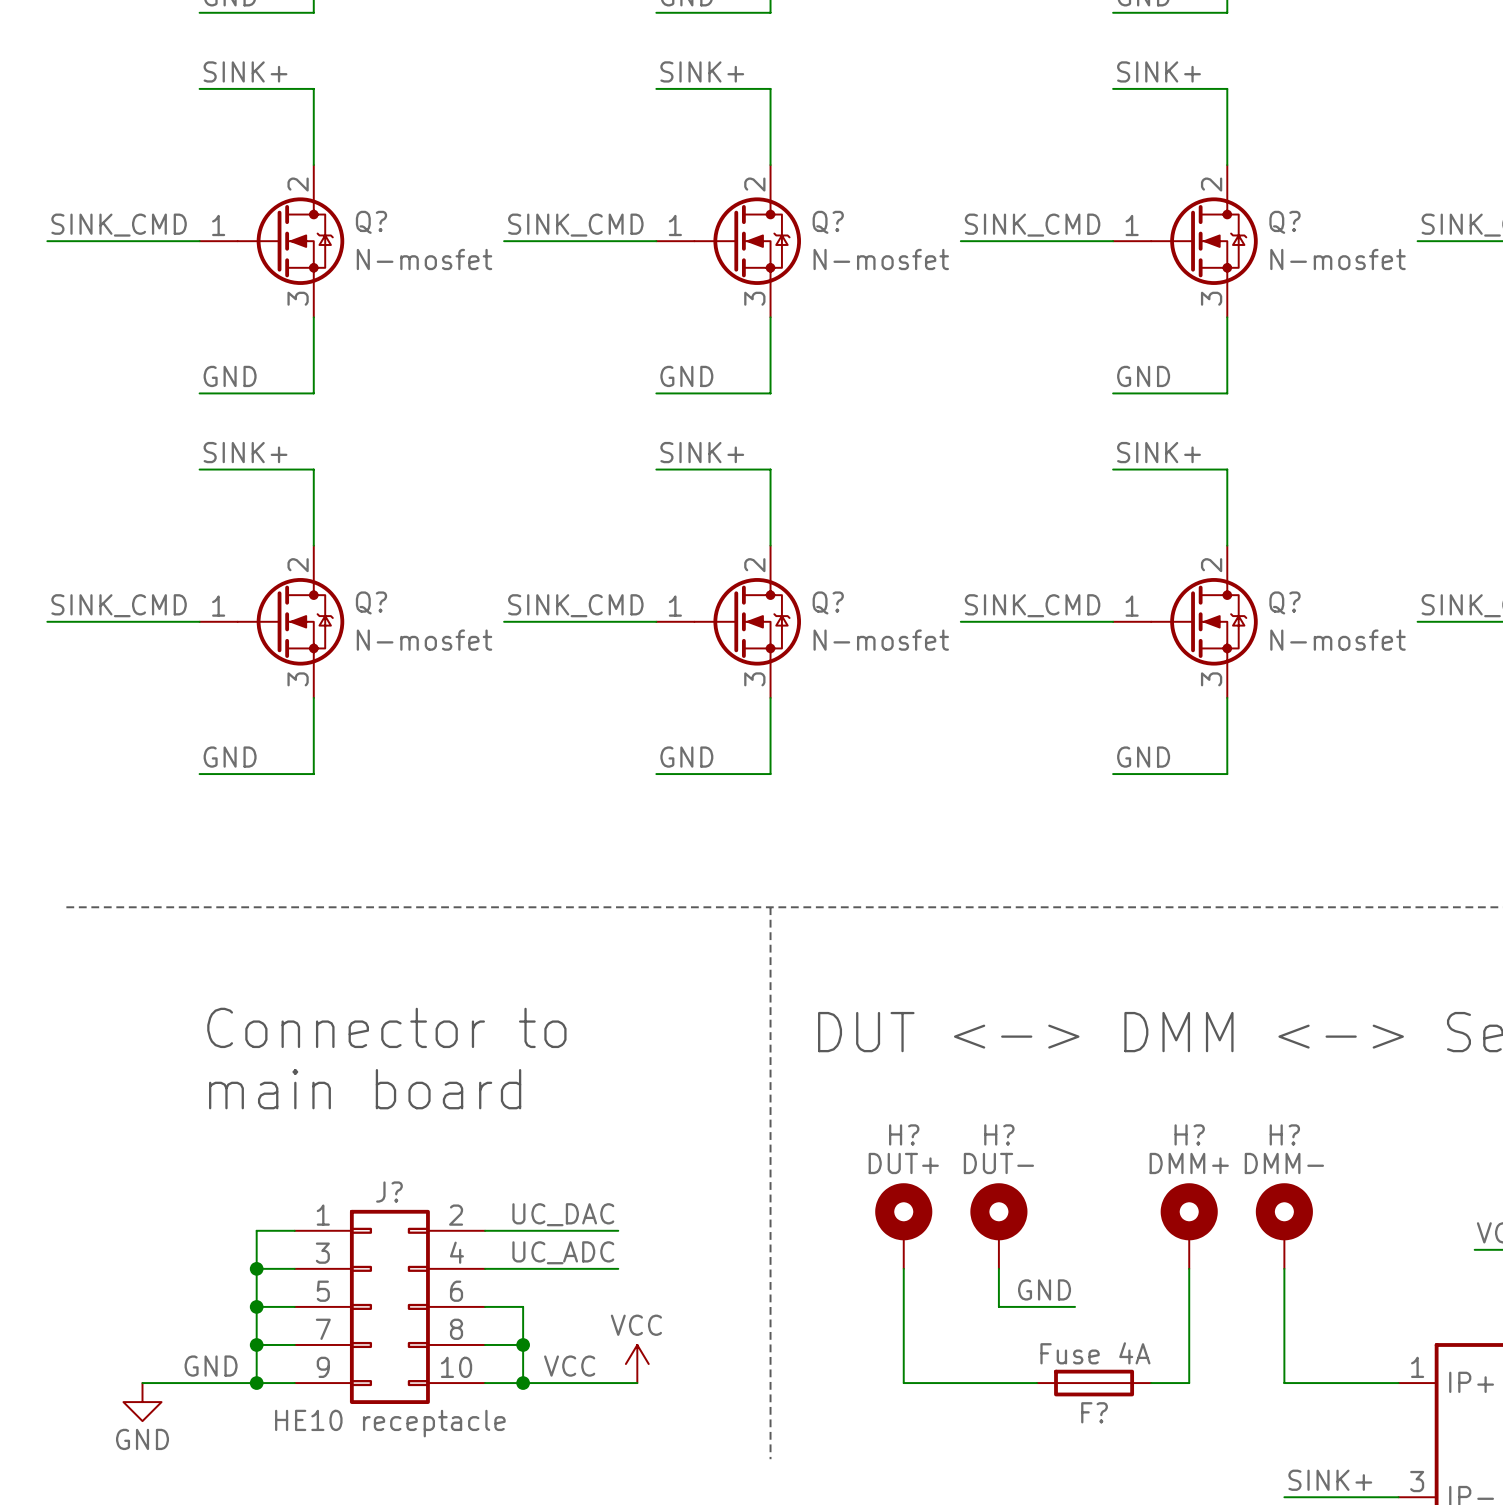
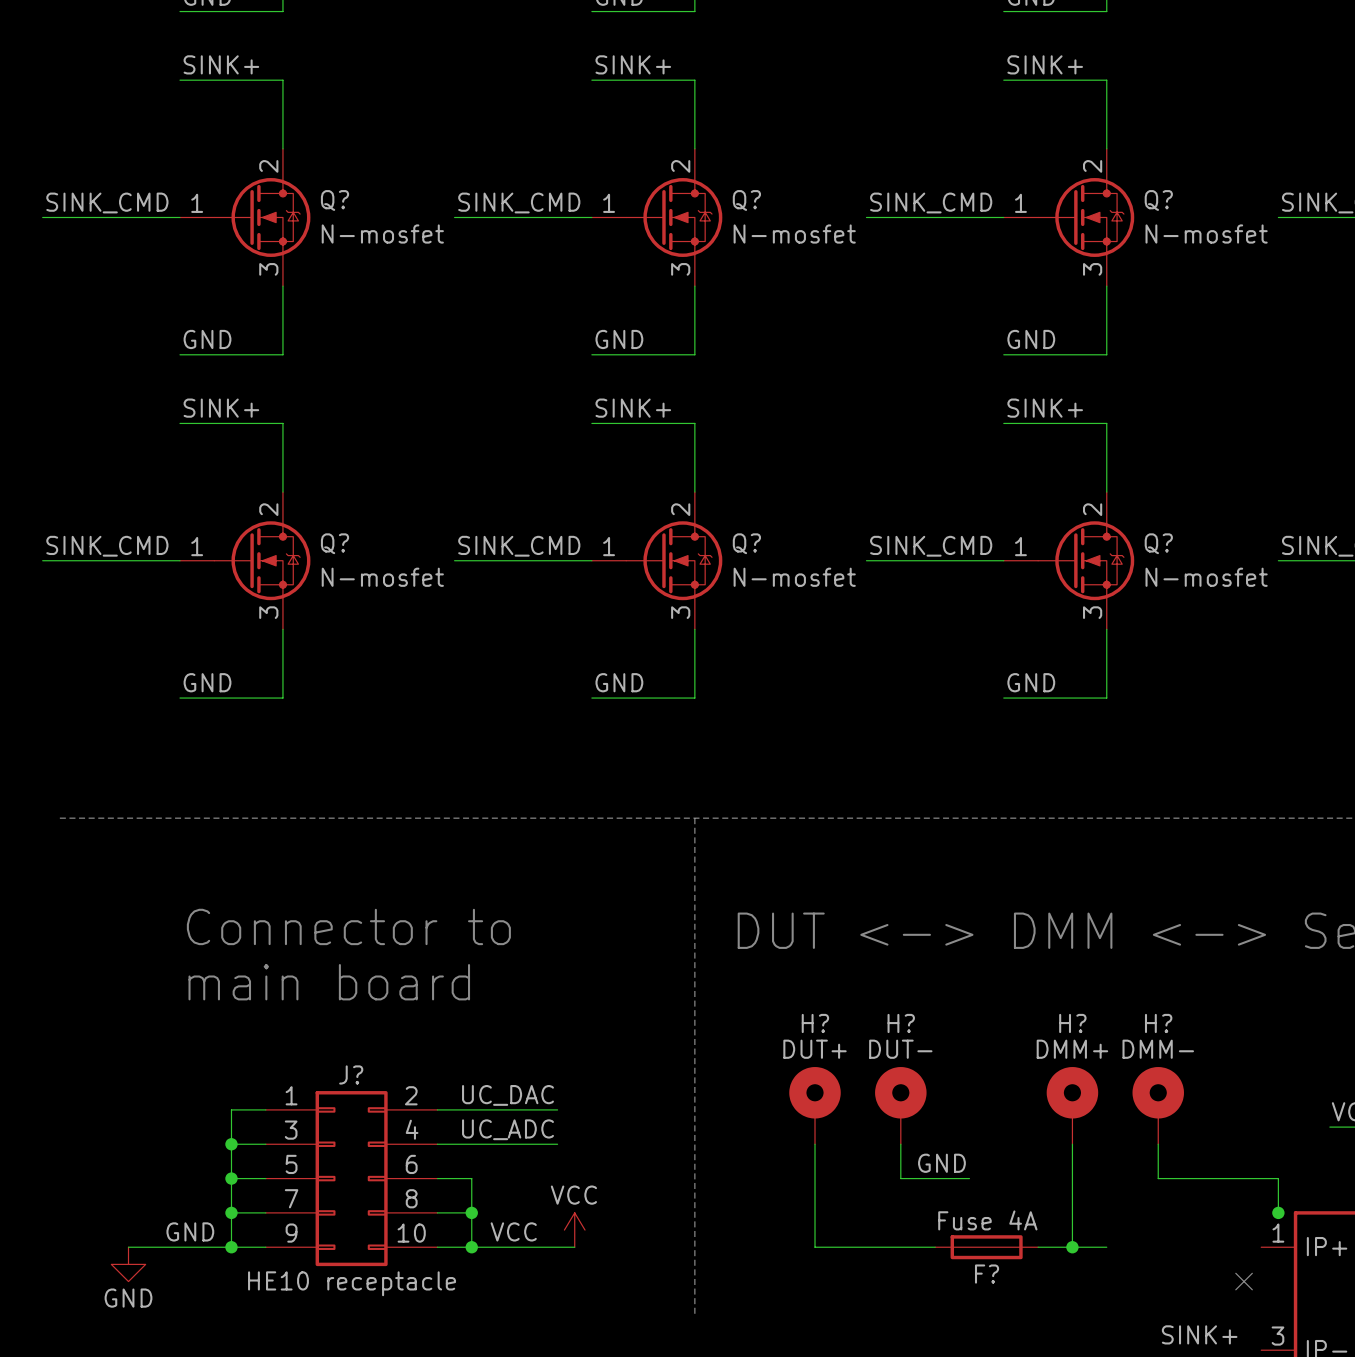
wire: (1284, 1306) (1284, 1383) (1398, 1383) -> (1158, 1178) (1278, 1178) (1278, 1212)
junction: none -> (1278, 1212)
wire: none -> (1072, 1247) (1106, 1247)
junction: none -> (1072, 1247)
no-connect mark: none -> (1244, 1281)
wire: (1284, 1497) (1398, 1497) -> none

